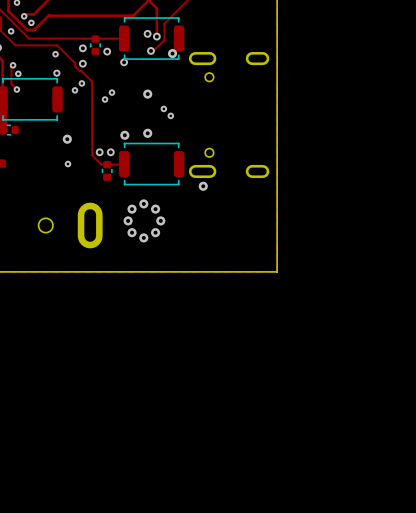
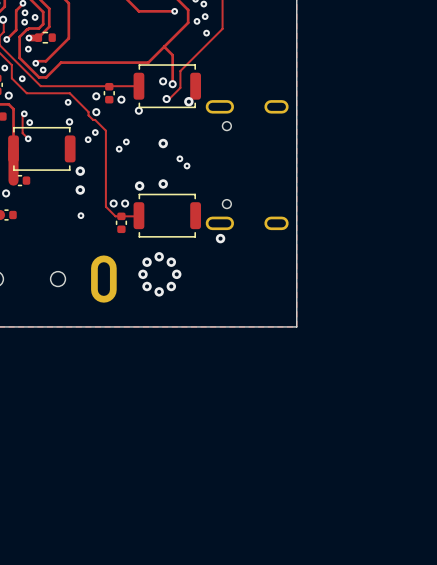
via: none -> (80, 171)

